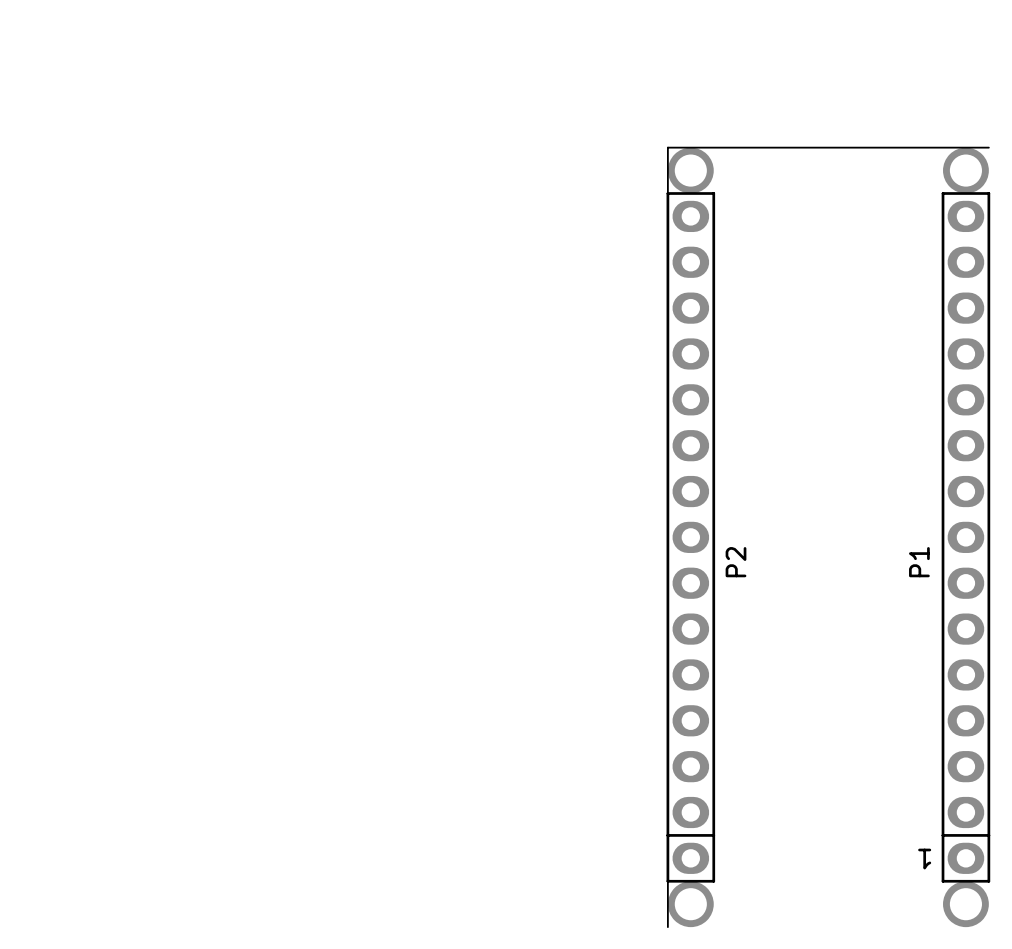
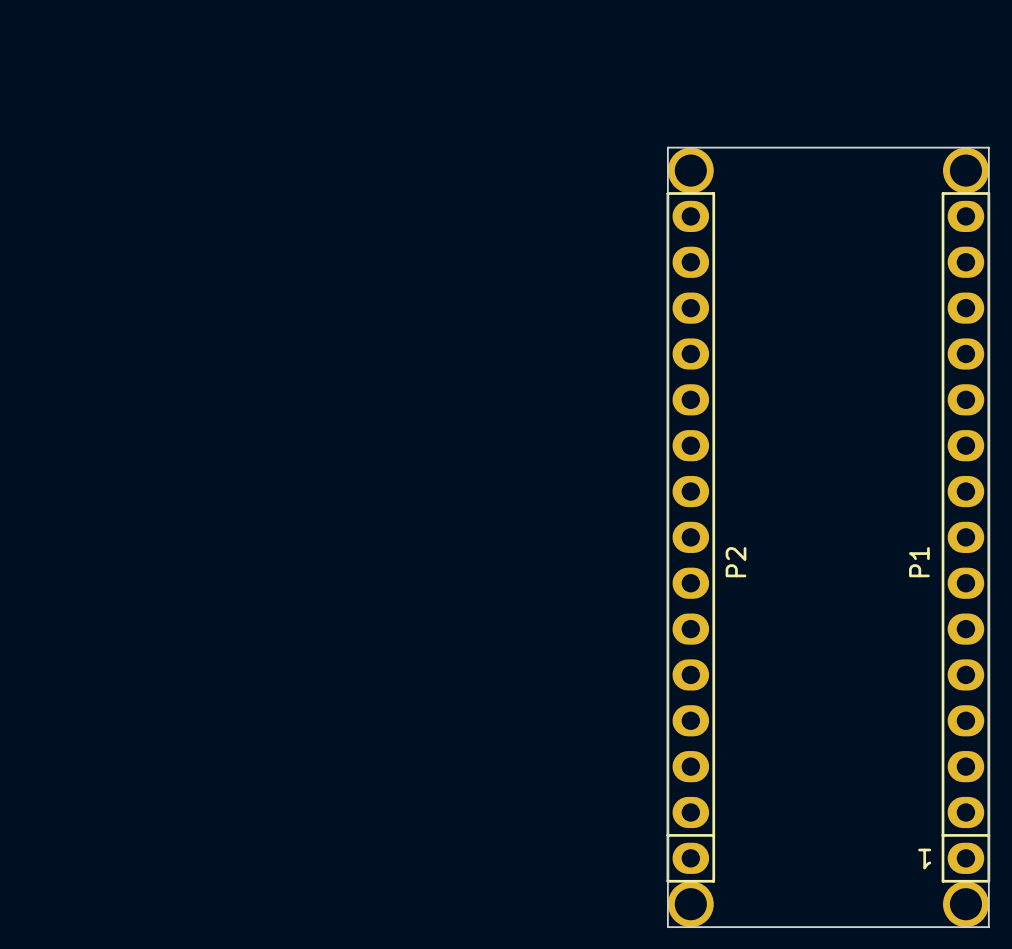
board edge: none -> (988, 147) (988, 927) (667, 927)

